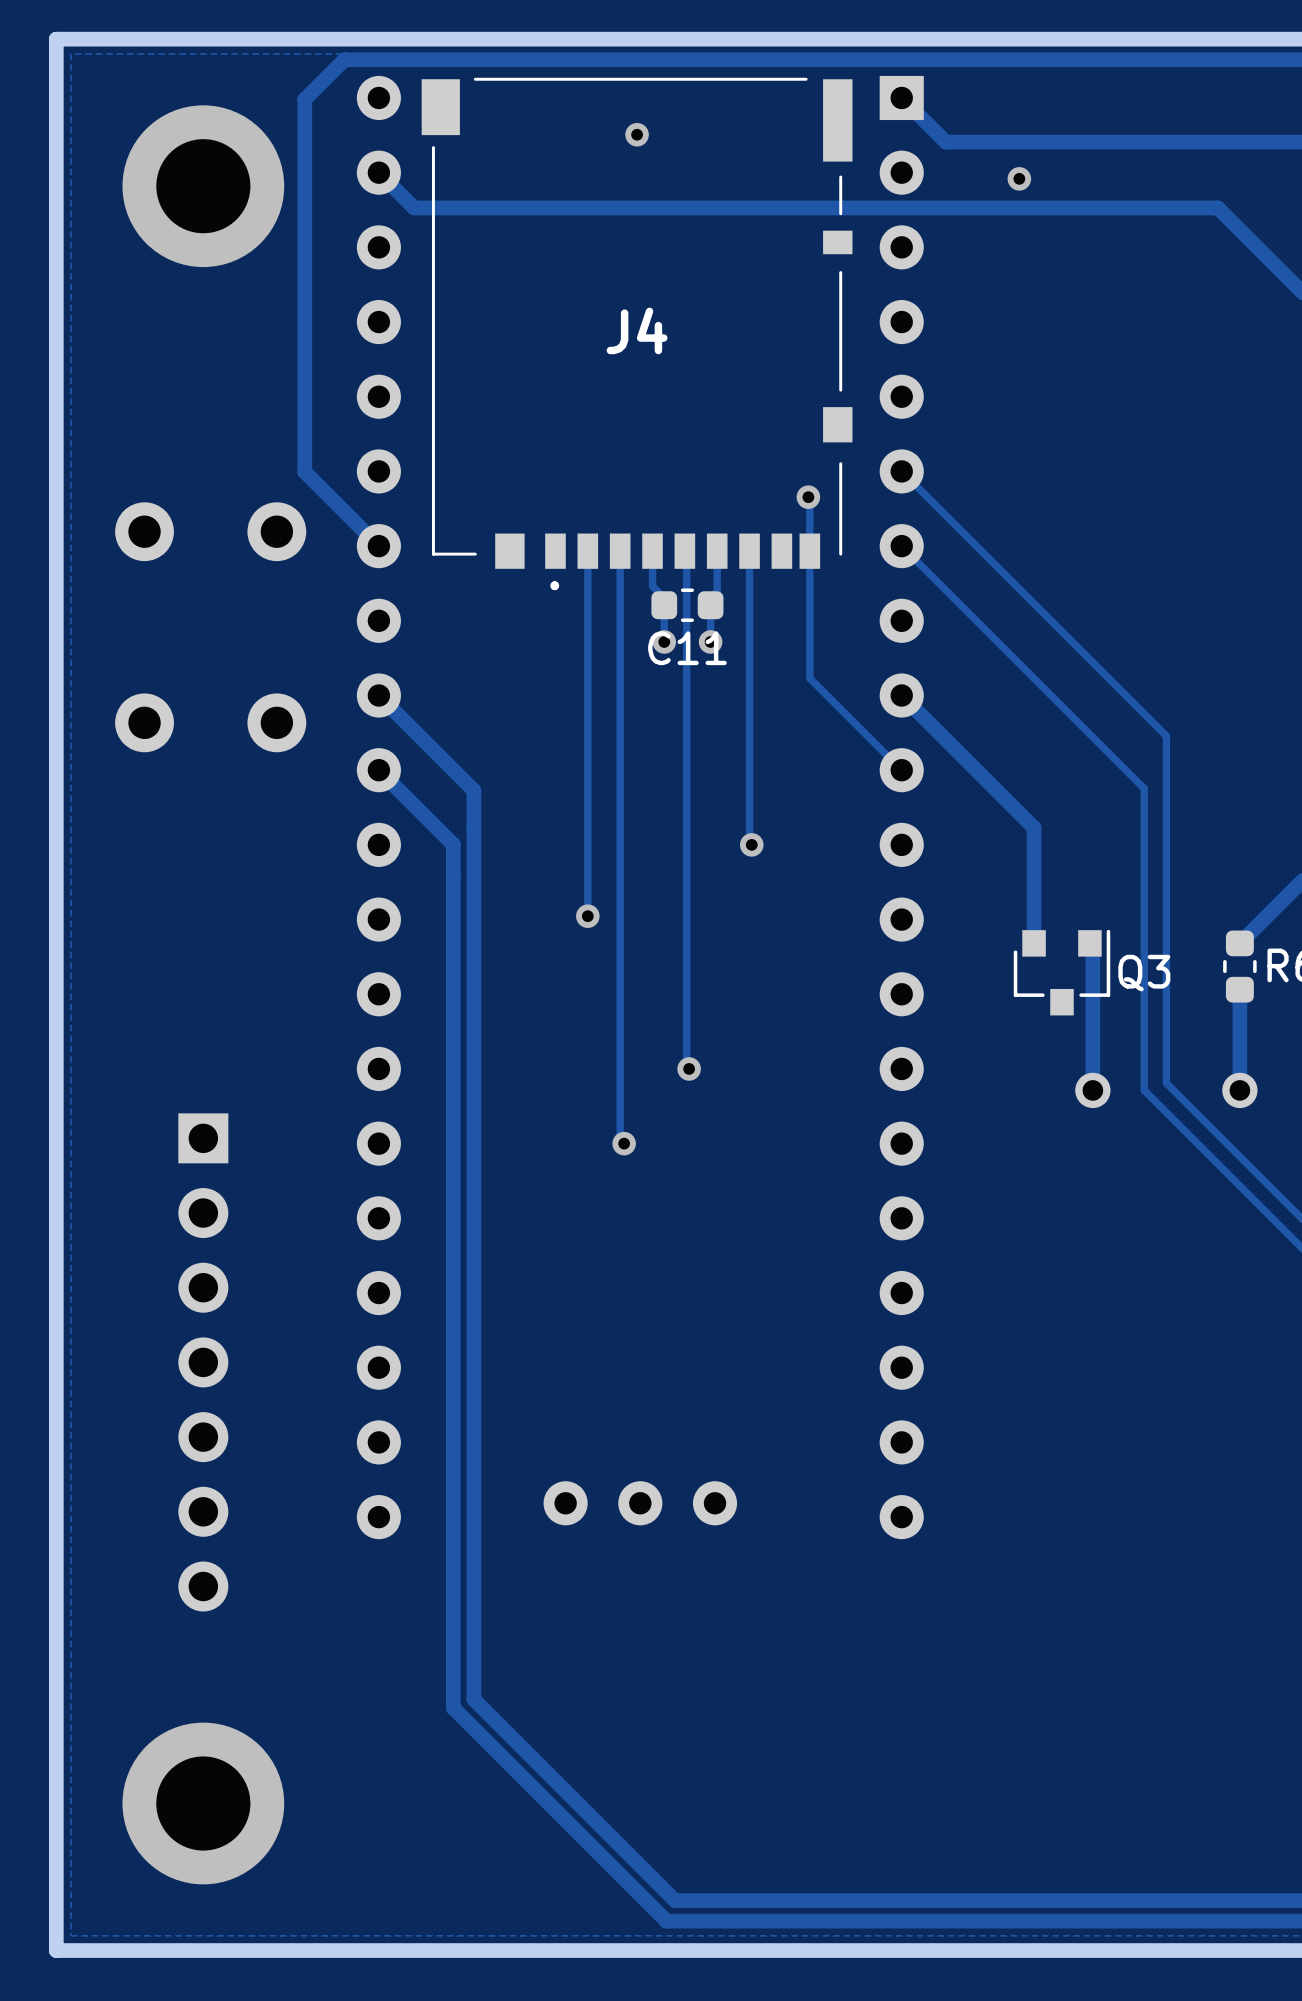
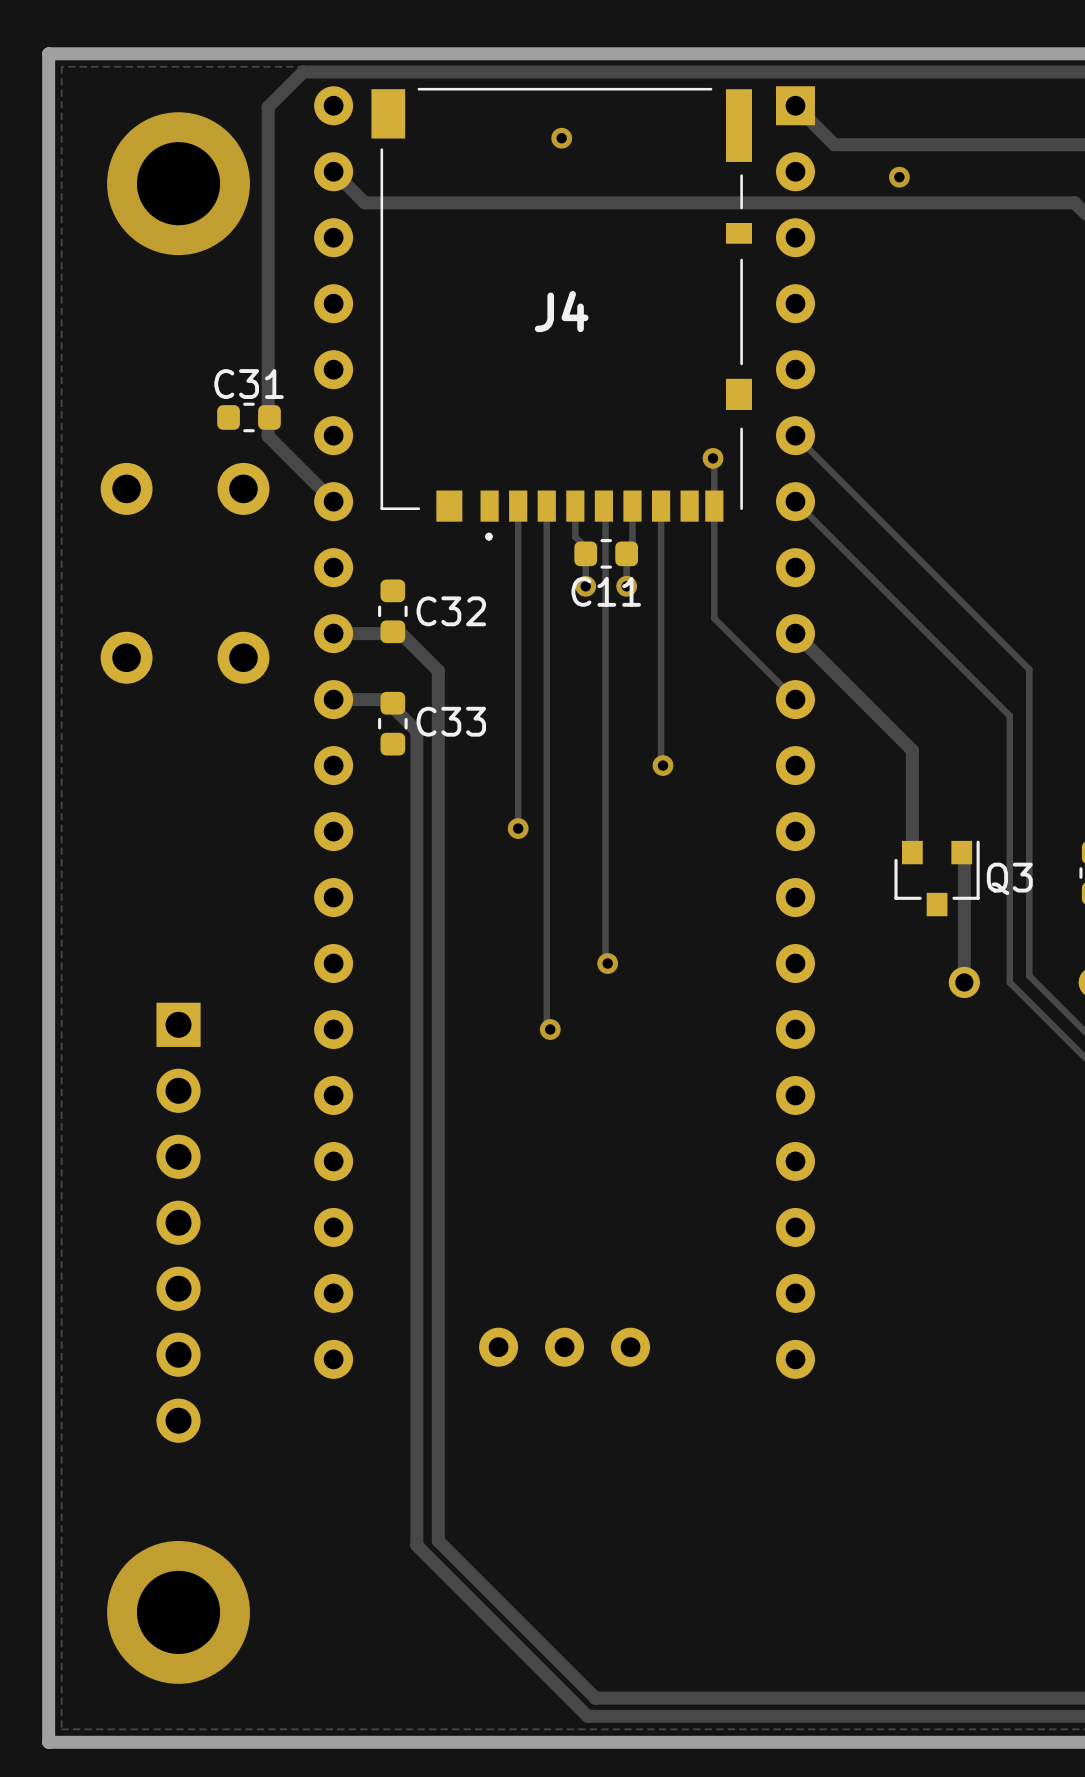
C31: none -> (249, 417)
C32: none -> (392, 611)
track: (378, 695) (473, 790) (473, 1699) (675, 1900) -> (333, 633) (401, 633) (438, 670) (438, 1540) (595, 1698)
track: (378, 770) (453, 844) (453, 1707) (473, 1727) -> (333, 699) (385, 699) (416, 731) (416, 1545)
C33: none -> (392, 723)

